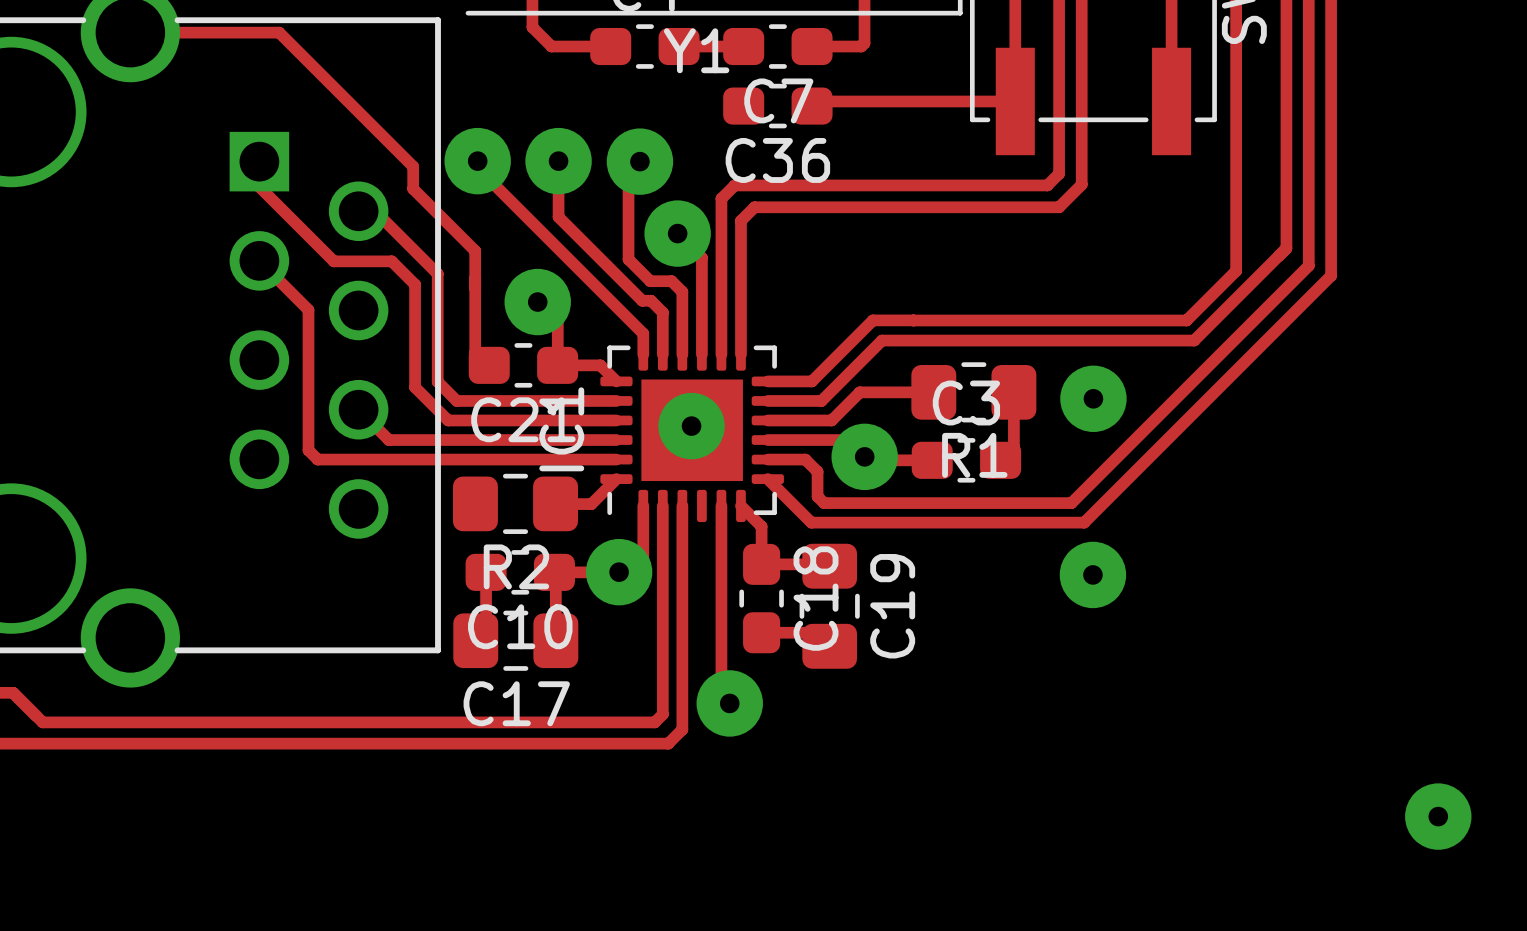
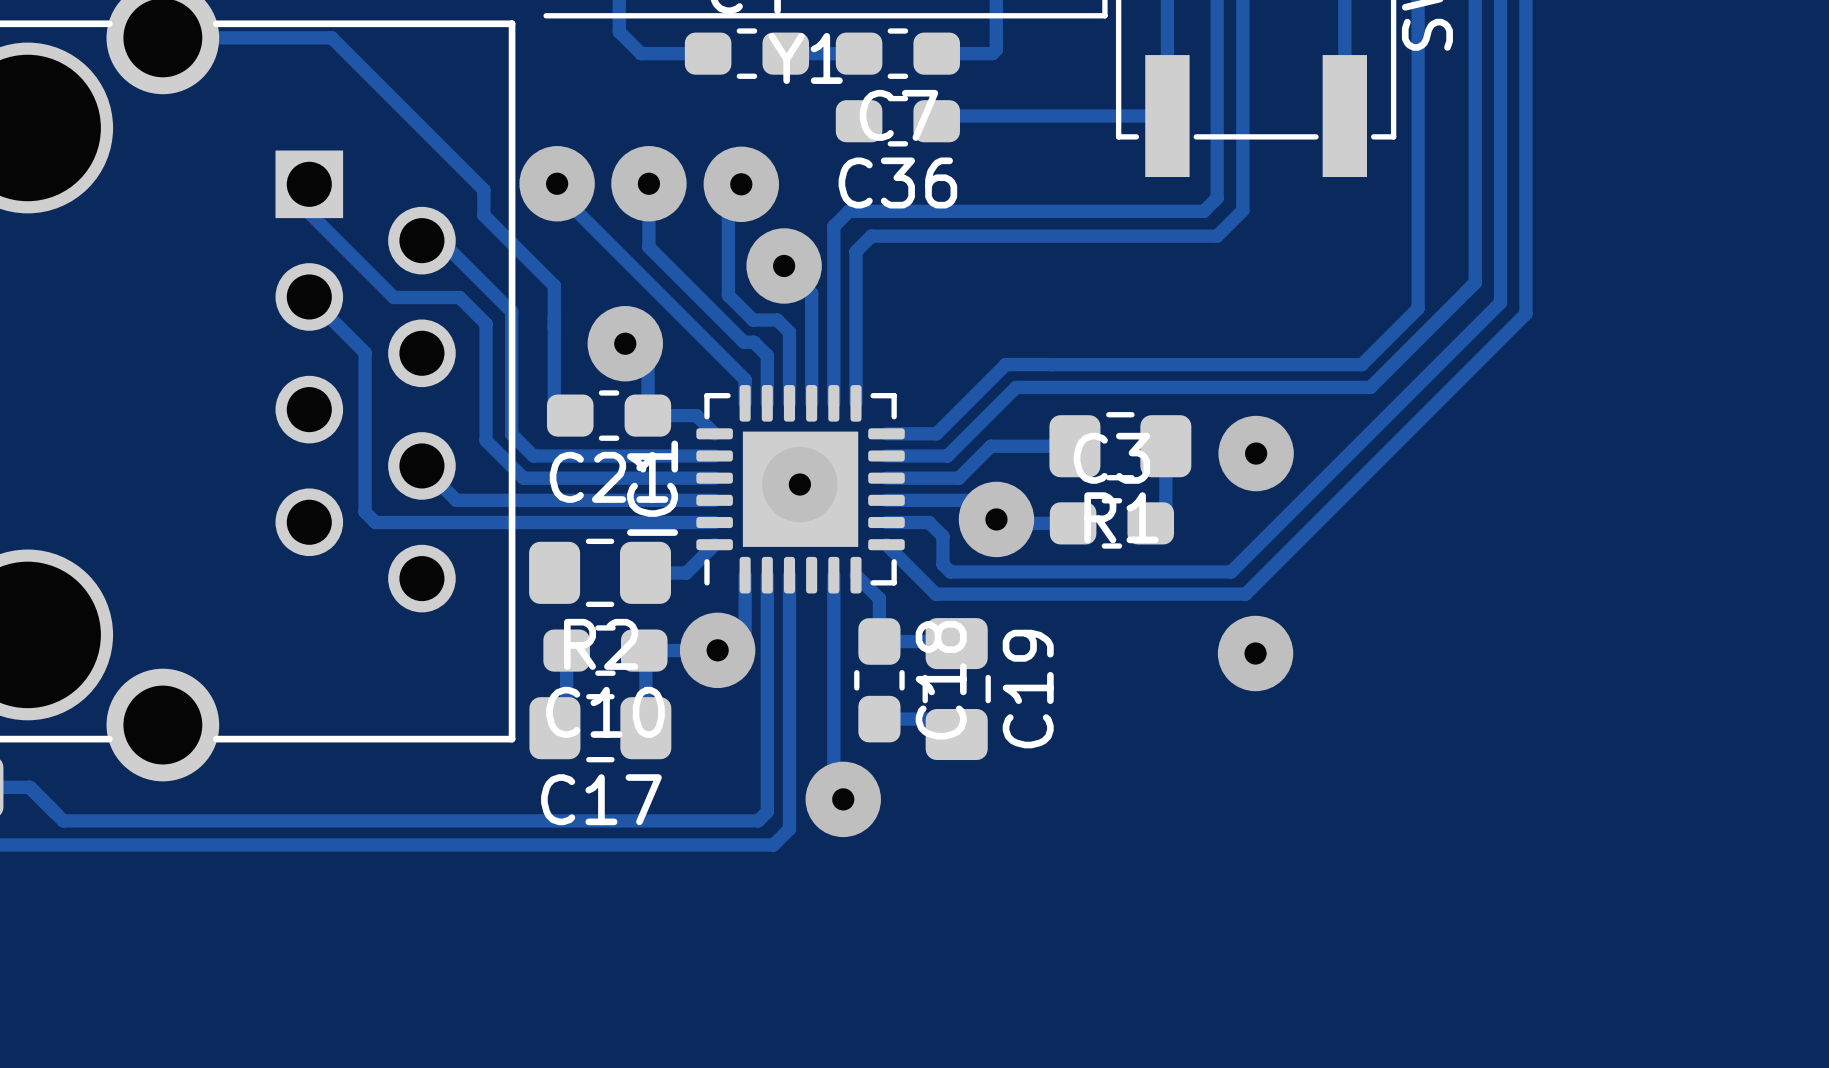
via: (1438, 816) -> none

